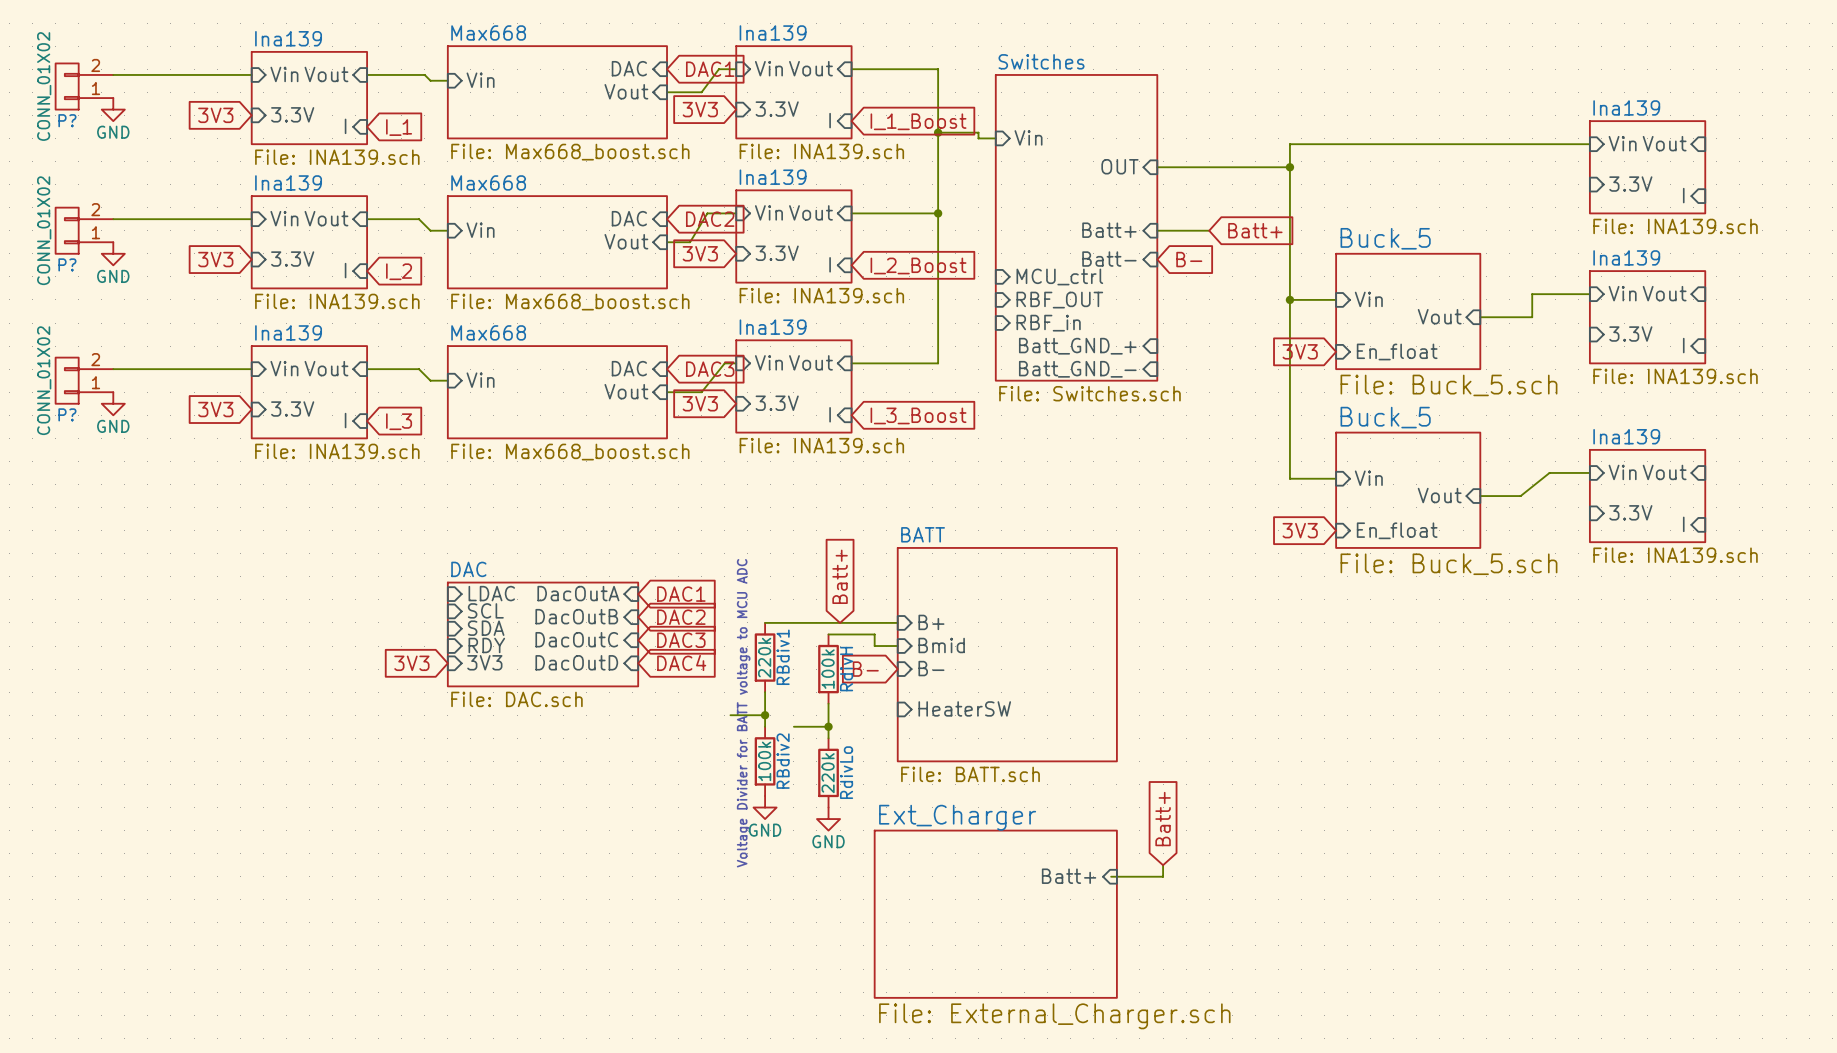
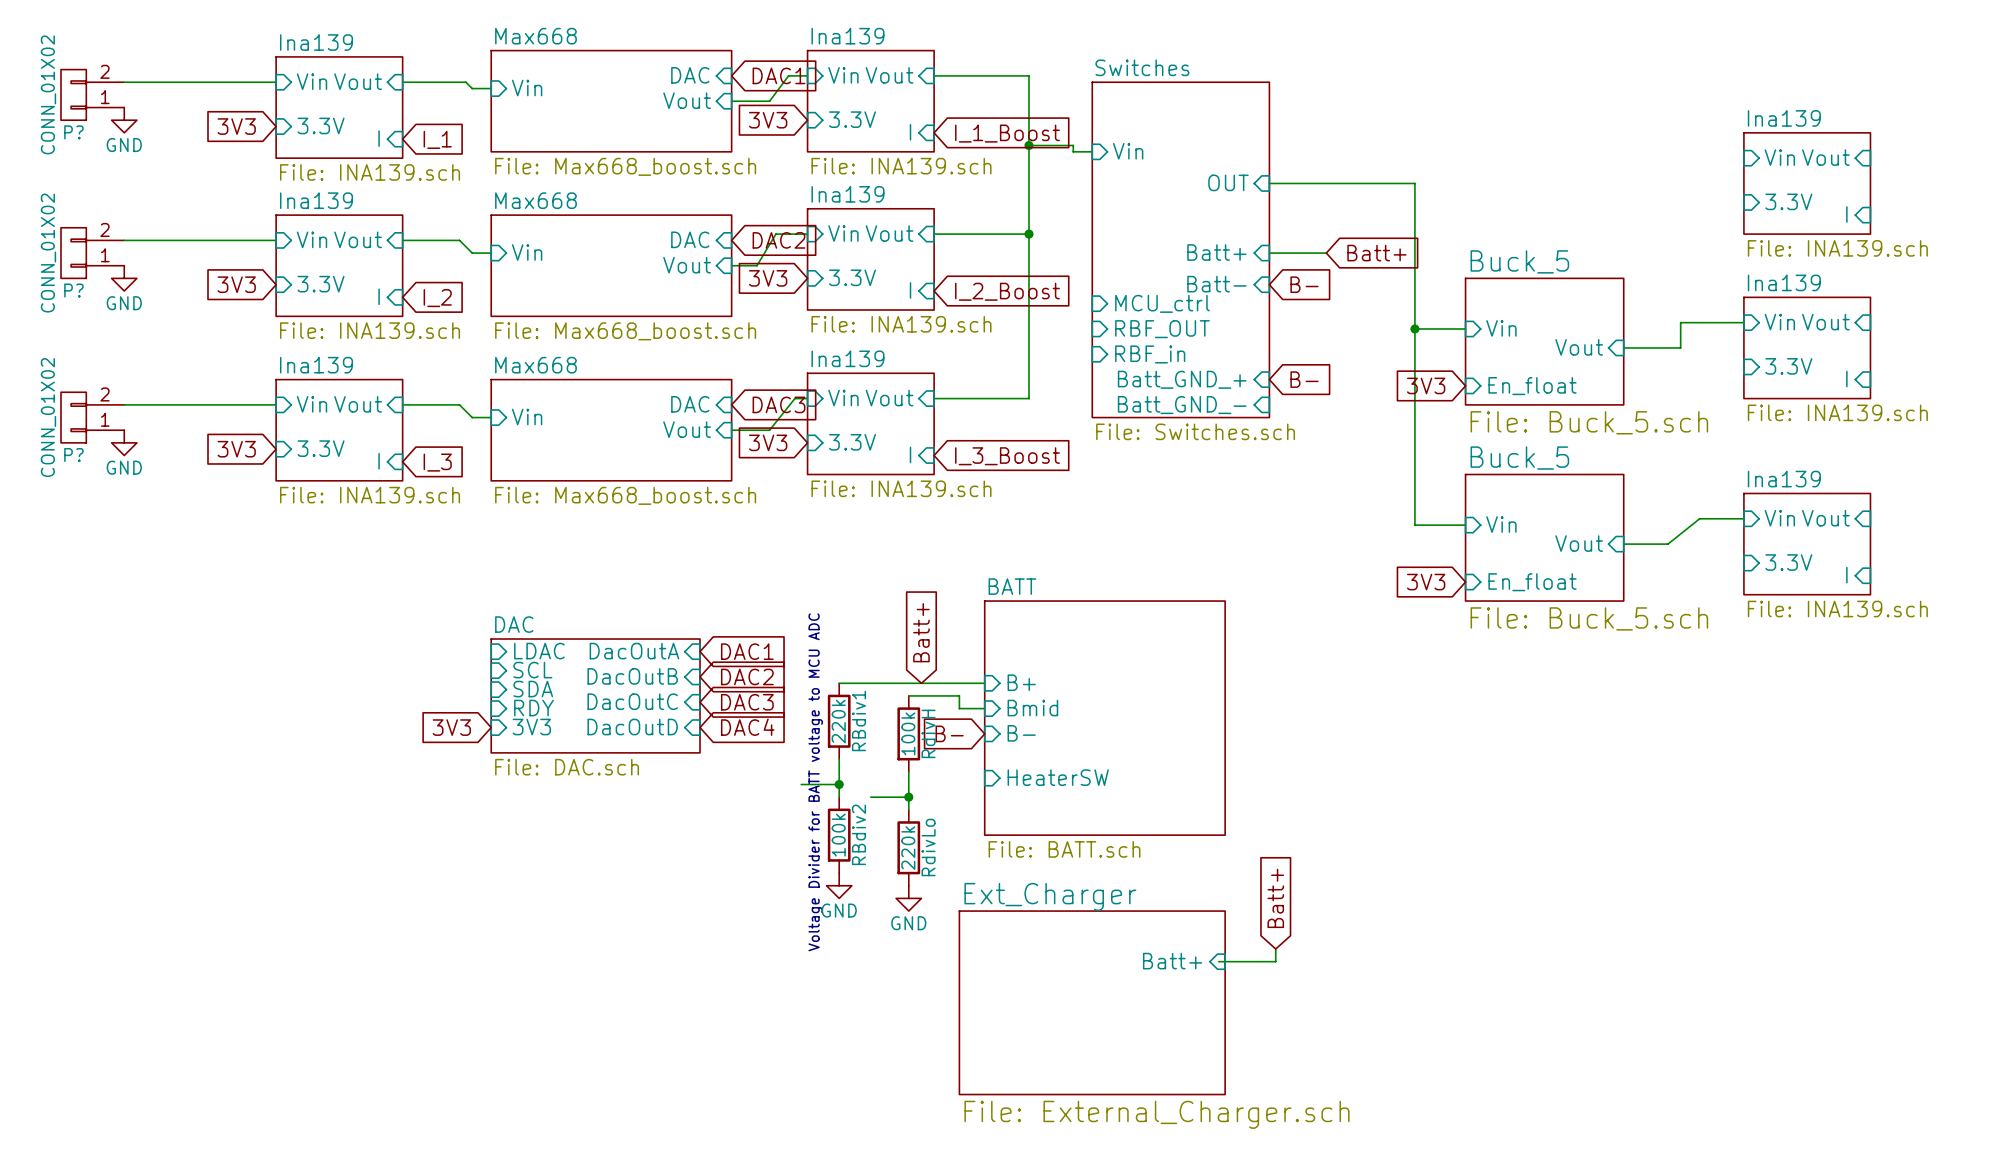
wire: (1589, 144) (1289, 144) (1289, 167) -> none
junction: (1289, 167) -> none
global label: none -> B- (1304, 379)

